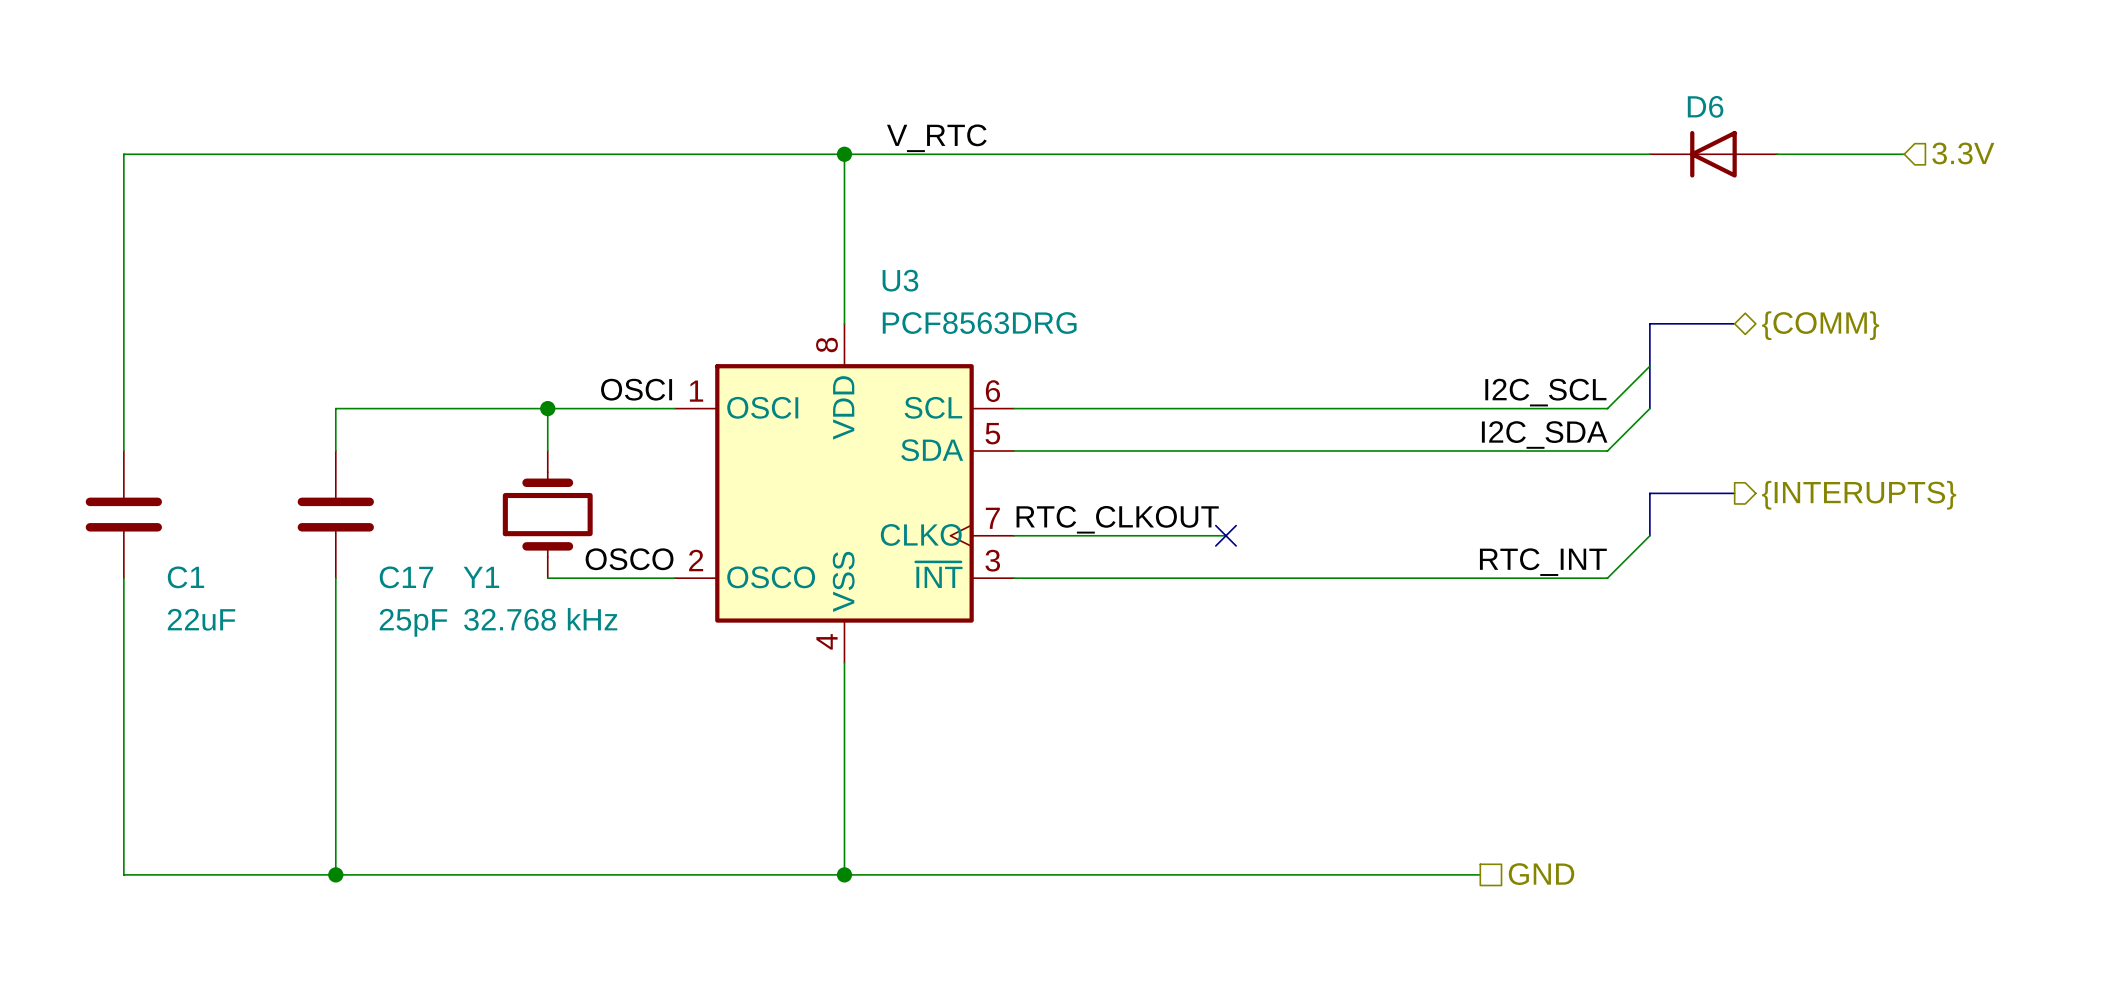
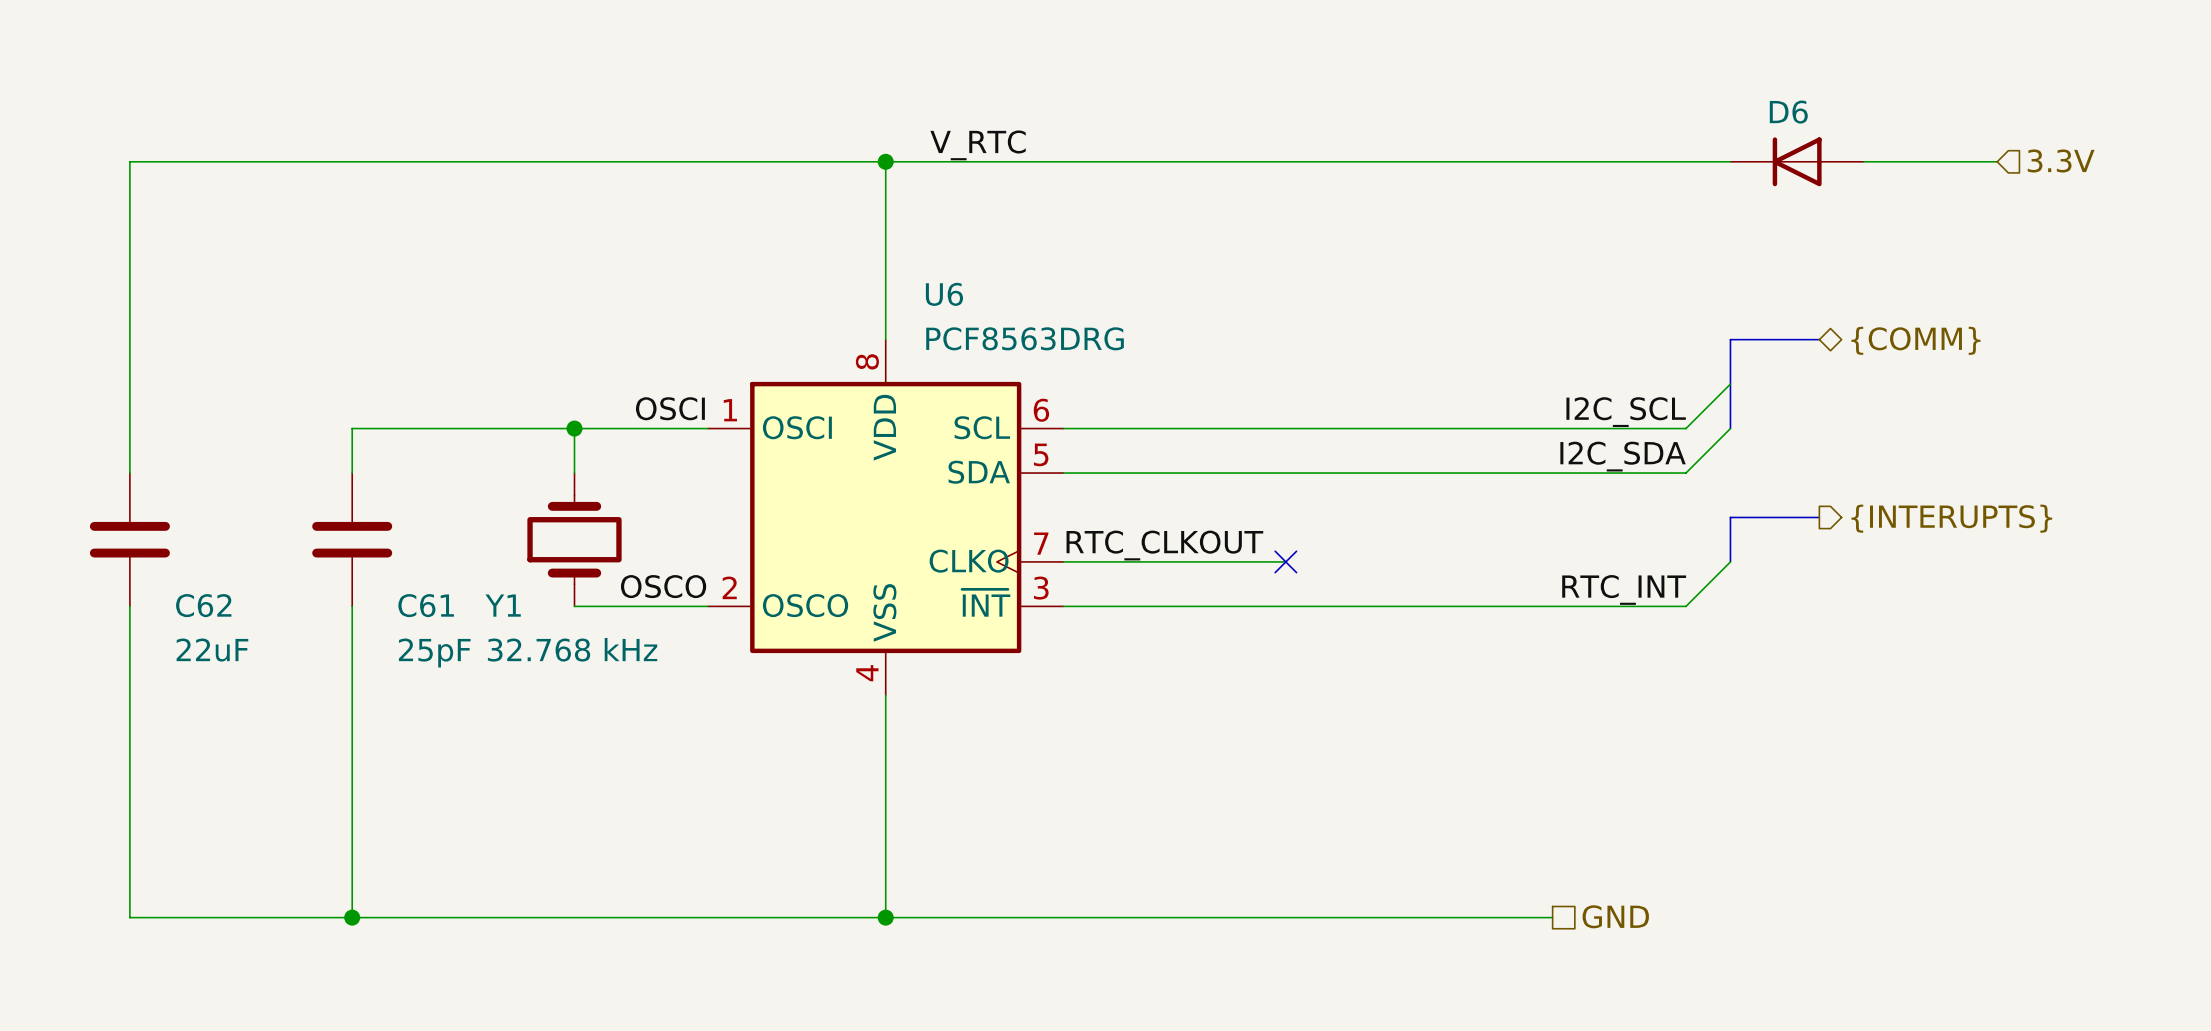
U3 name: U3 (900, 280) -> U6 (944, 294)
C1 name: C1 (185, 577) -> C62 (203, 605)
C17 name: C17 (406, 577) -> C61 (426, 605)

